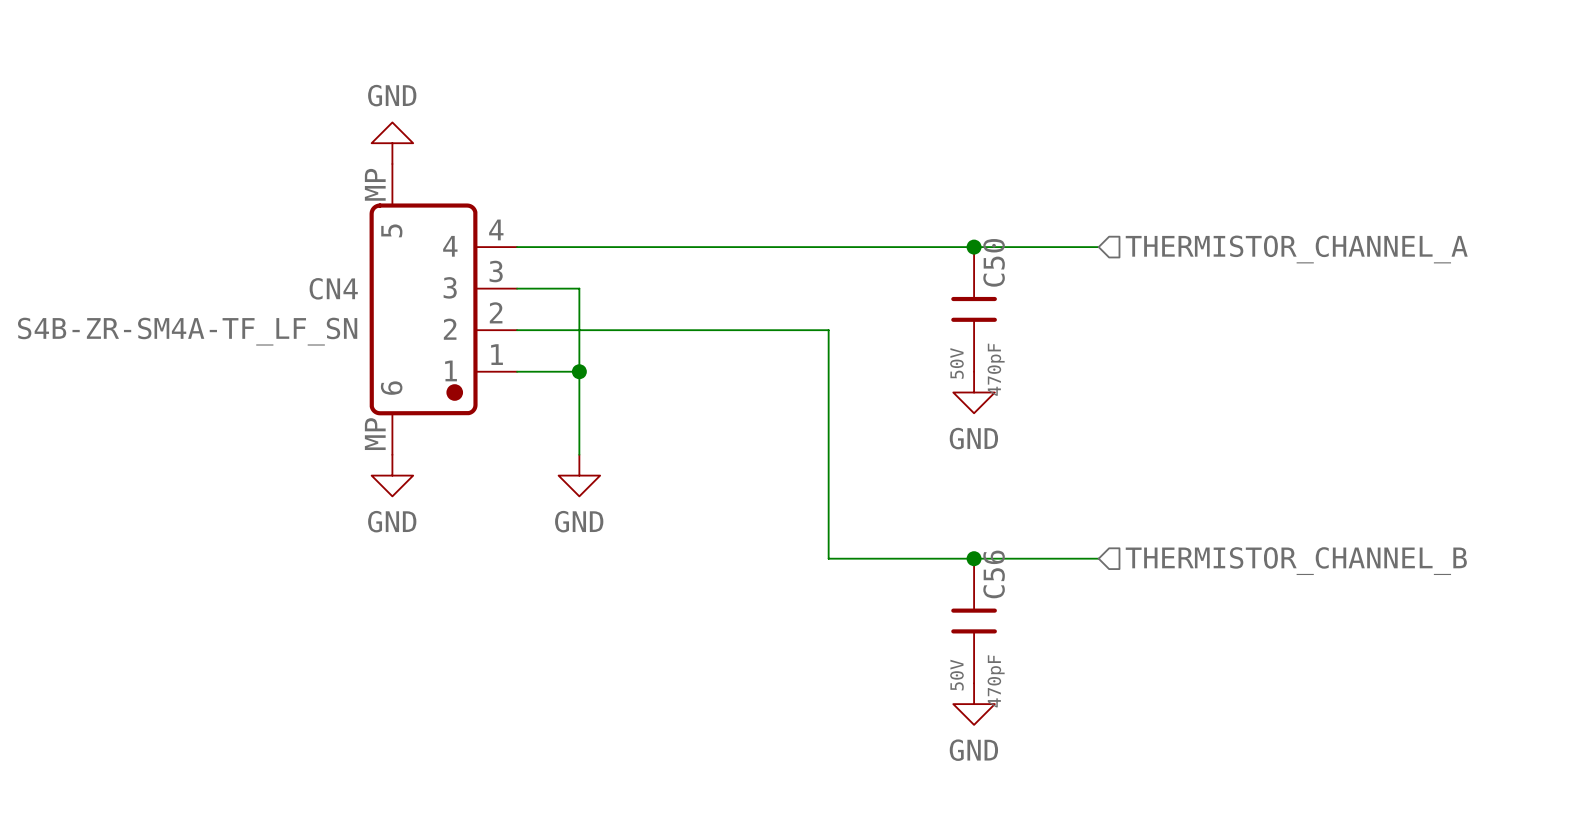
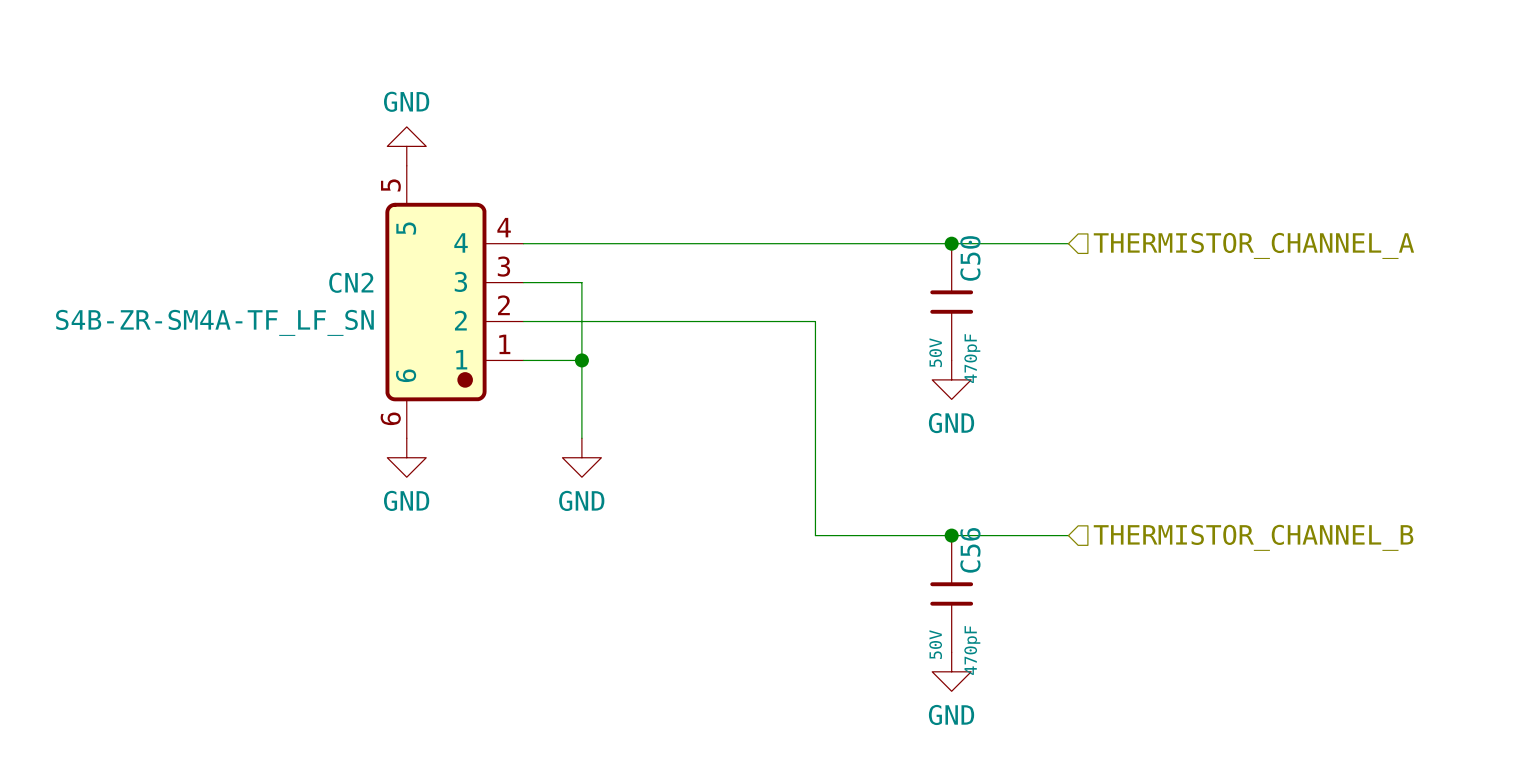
CN4 pin number: MP (375, 184) -> 5 (390, 185)
CN4 name: CN4 (333, 288) -> CN2 (351, 282)
CN4 pin number: MP (375, 434) -> 6 (390, 418)

